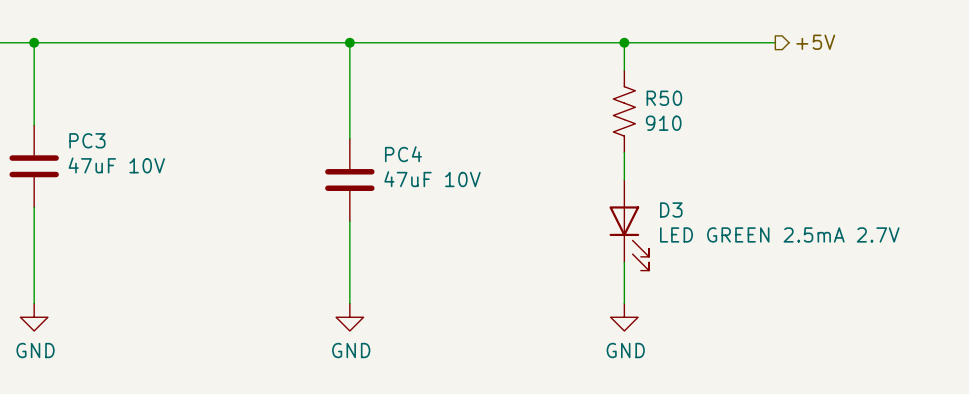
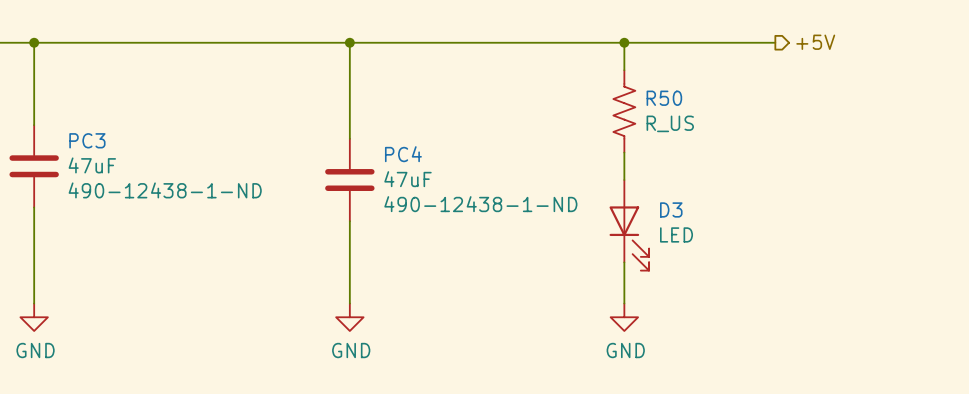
R50 value: 910 (663, 123) -> R_US (670, 123)
PC3 value: 47uF 10V (116, 165) -> 47uF (92, 165)
PC4 value: 47uF 10V (432, 179) -> 47uF (407, 179)
PC3 text: none -> 490-12438-1-ND (165, 190)
PC4 text: none -> 490-12438-1-ND (480, 204)
D3 value: LED GREEN 2.5mA 2.7V (779, 234) -> LED (676, 234)

